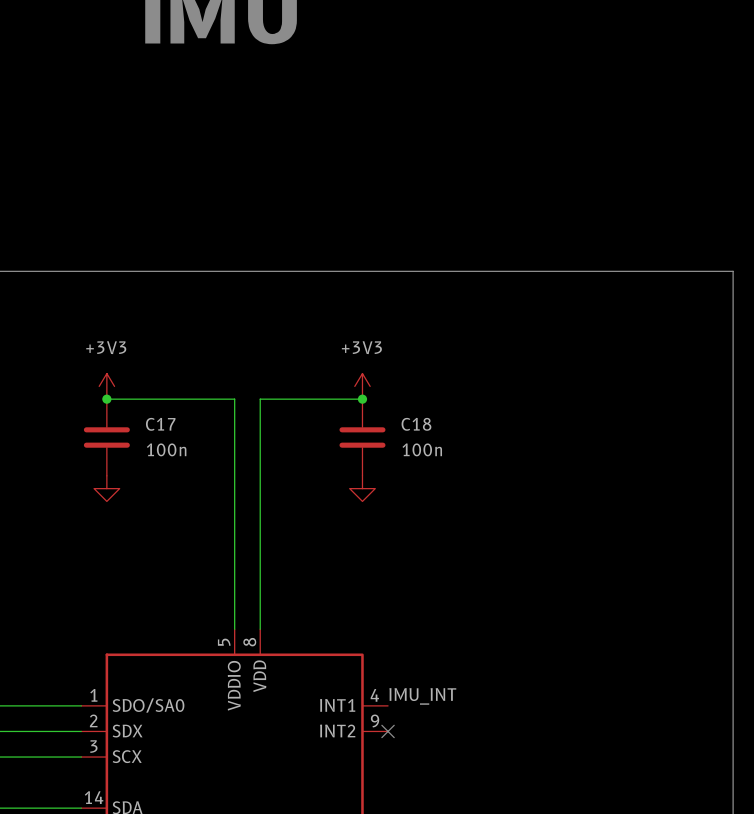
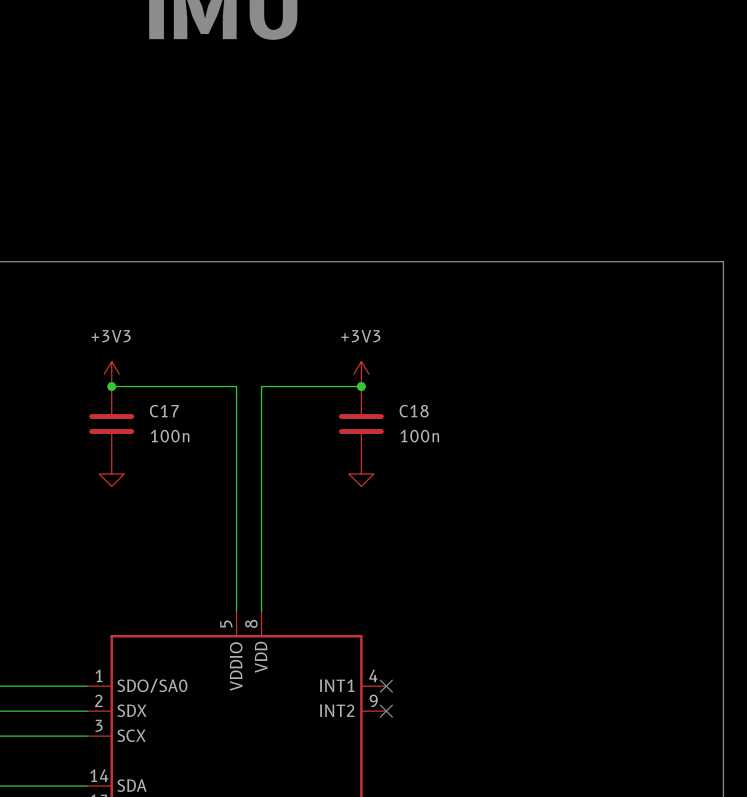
label: IMU_INT (422, 696) -> none
no-connect mark: none -> (386, 686)

